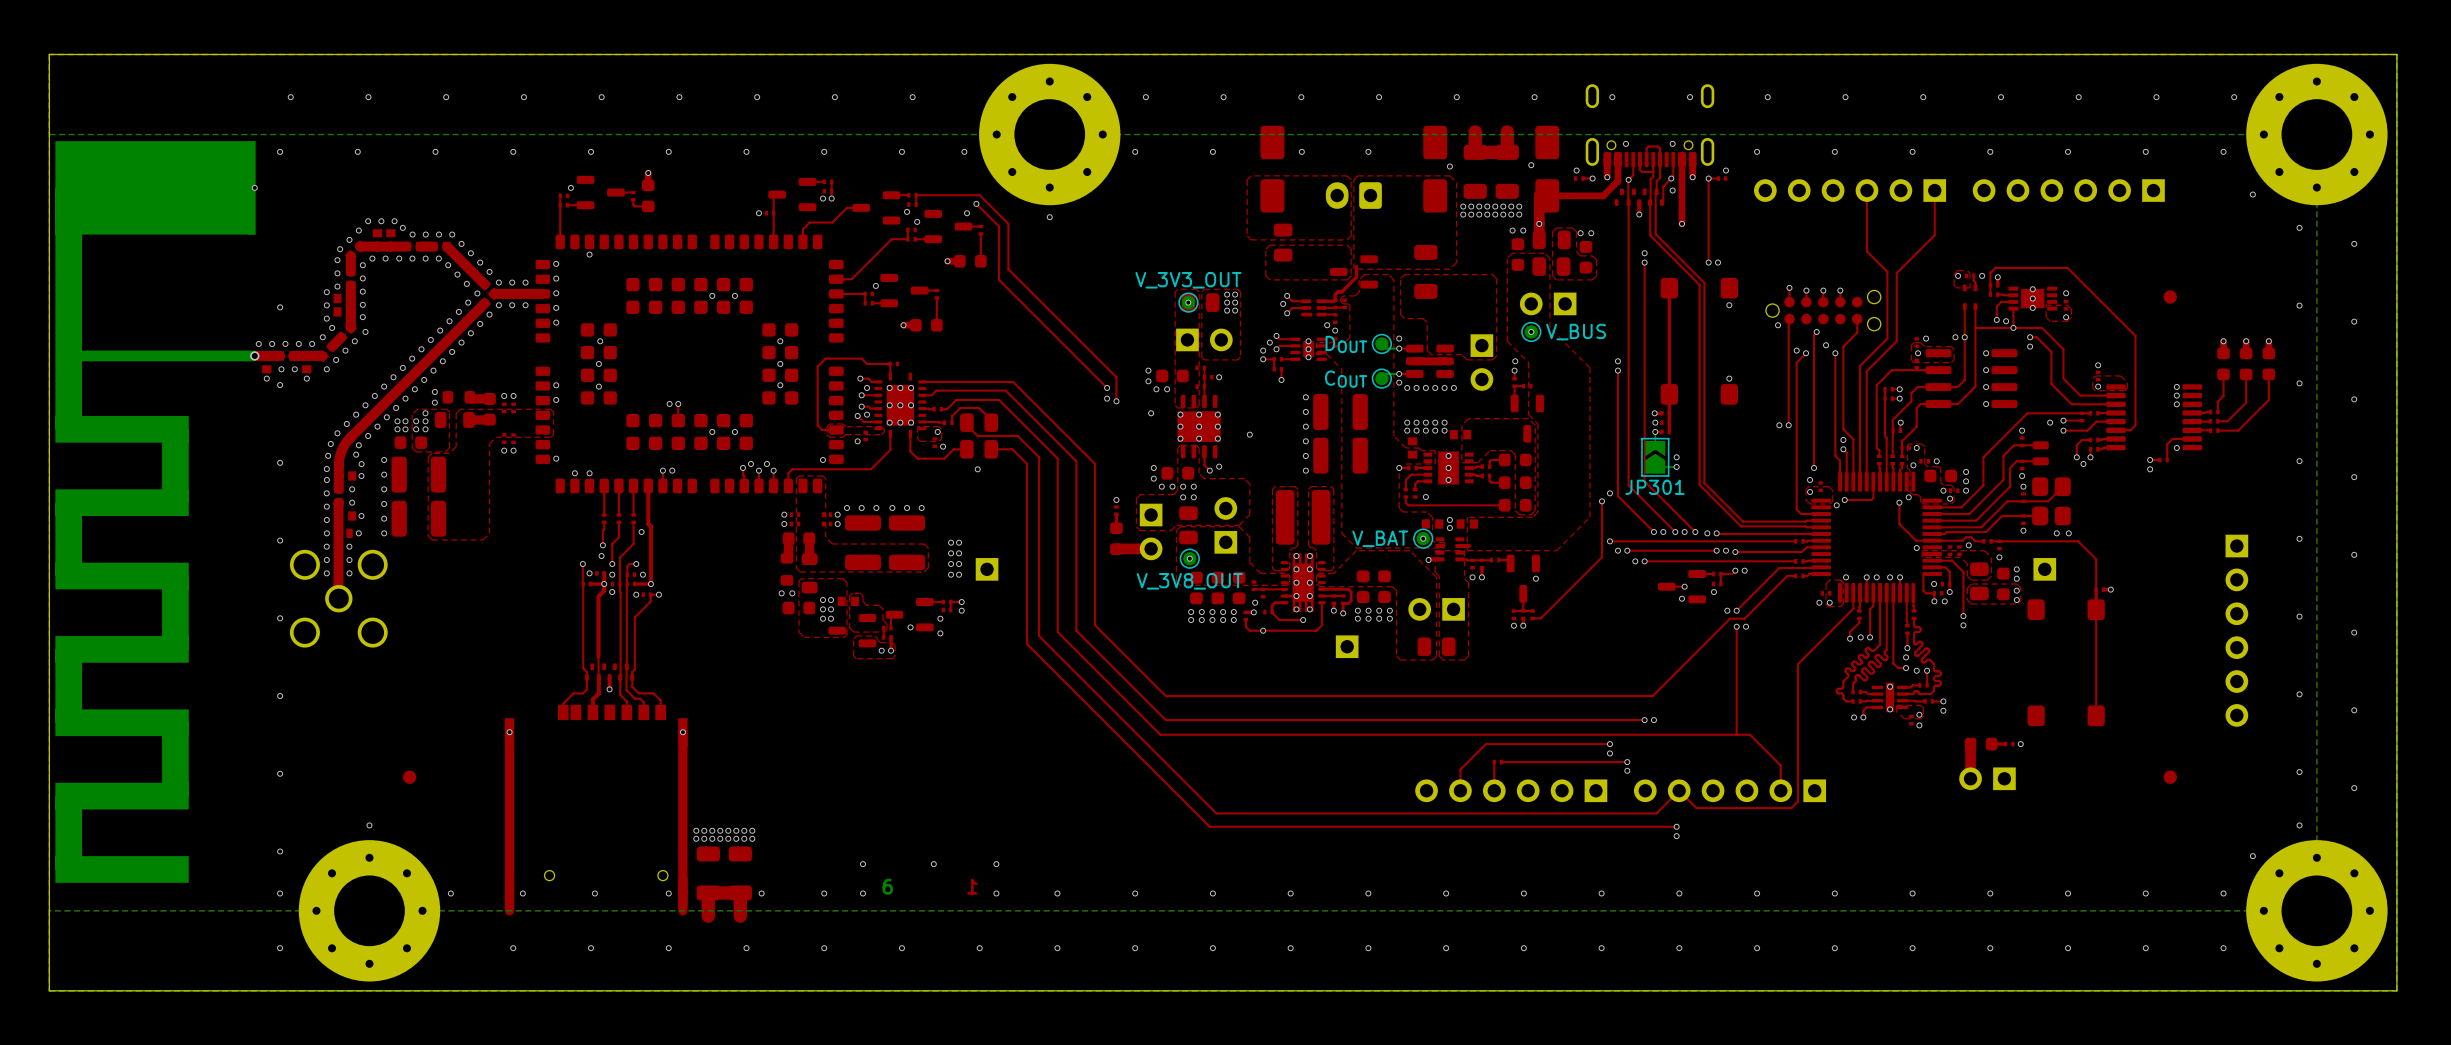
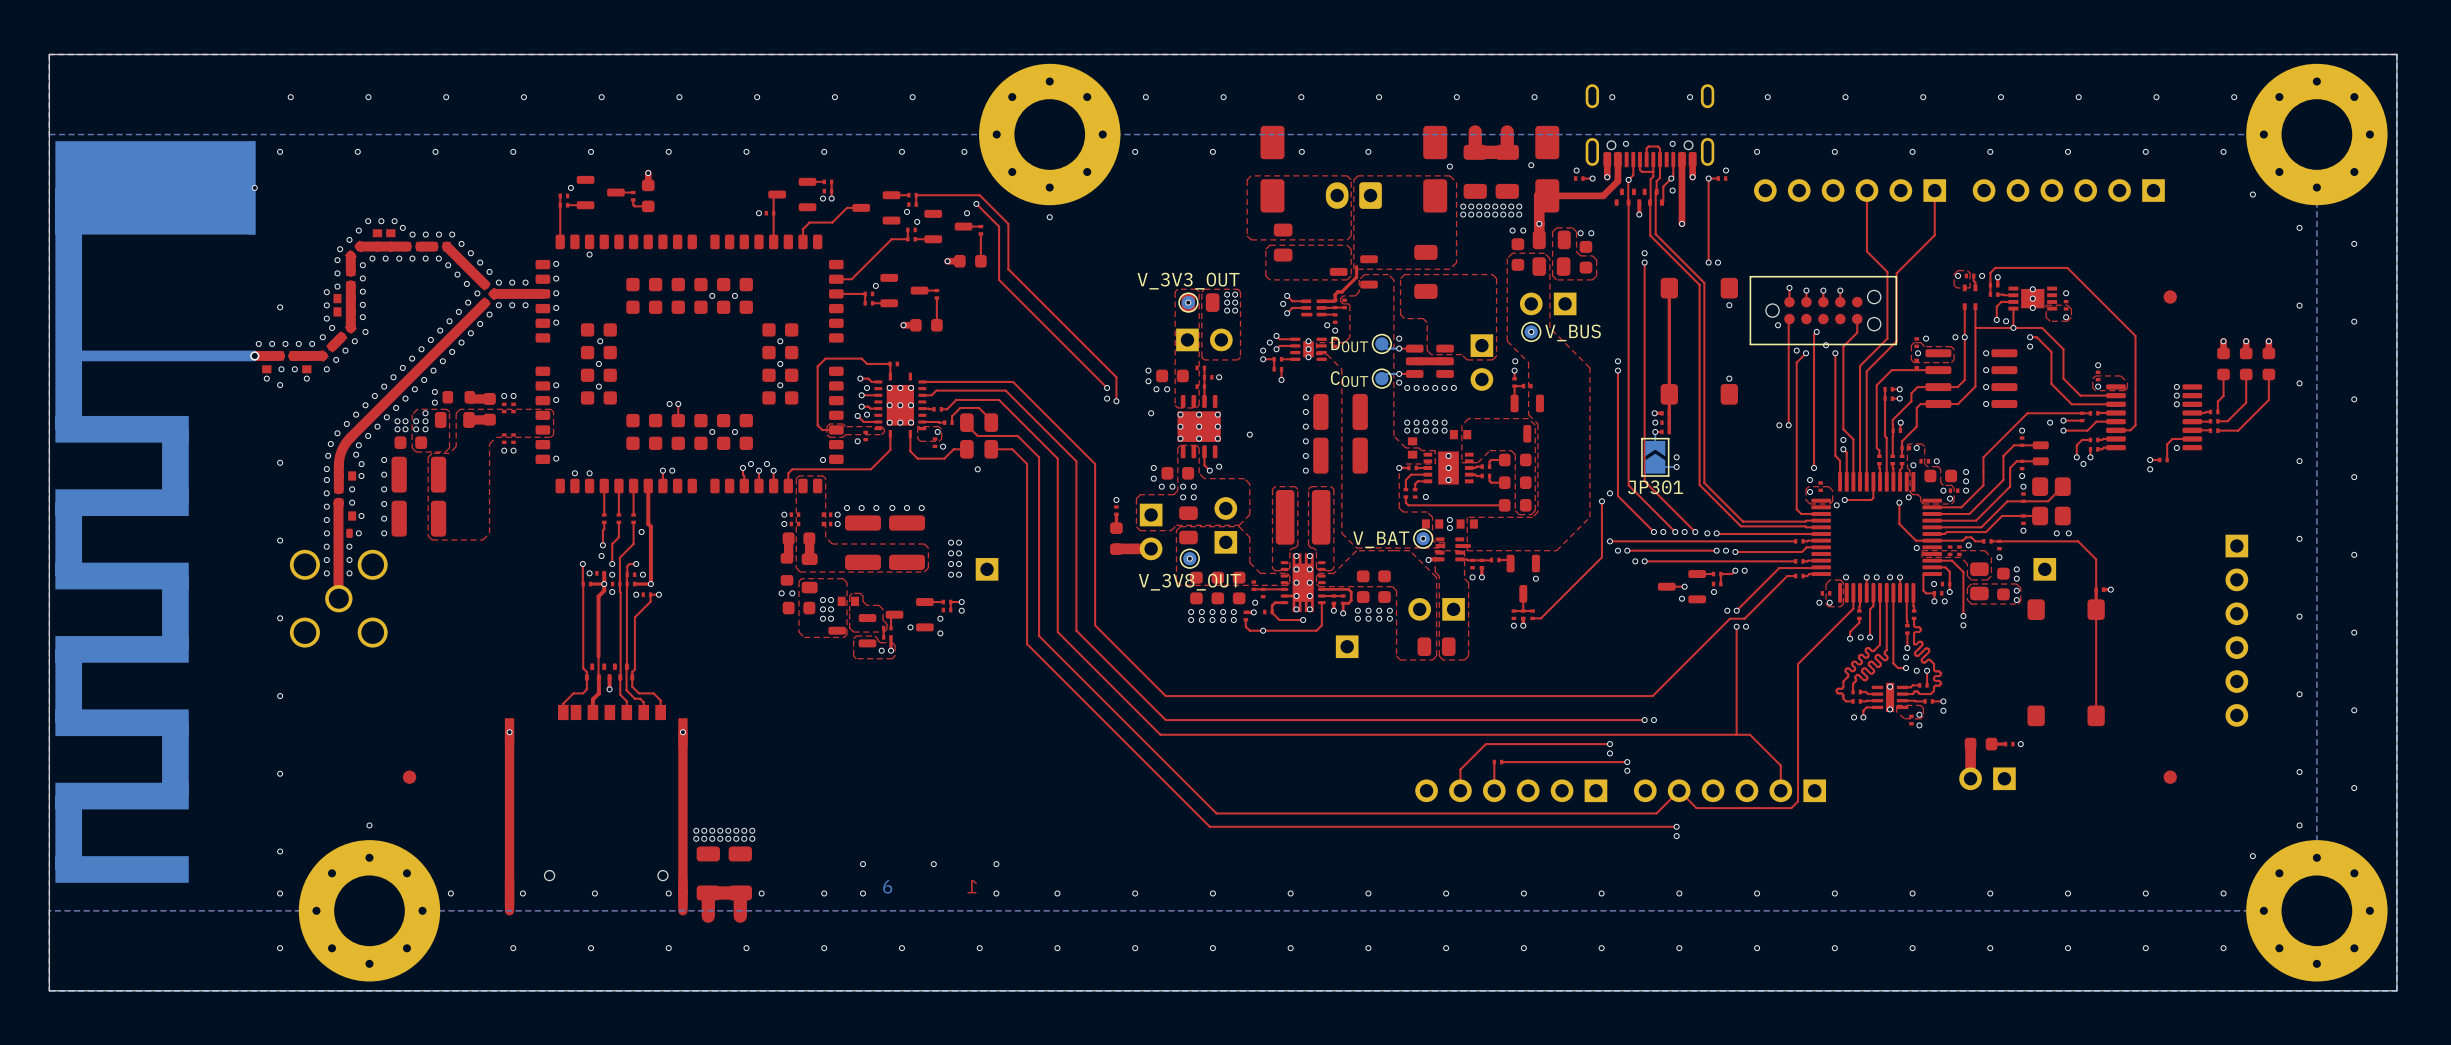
part footprint: [1765, 290, 1881, 331] -> [1749, 275, 1898, 346]

